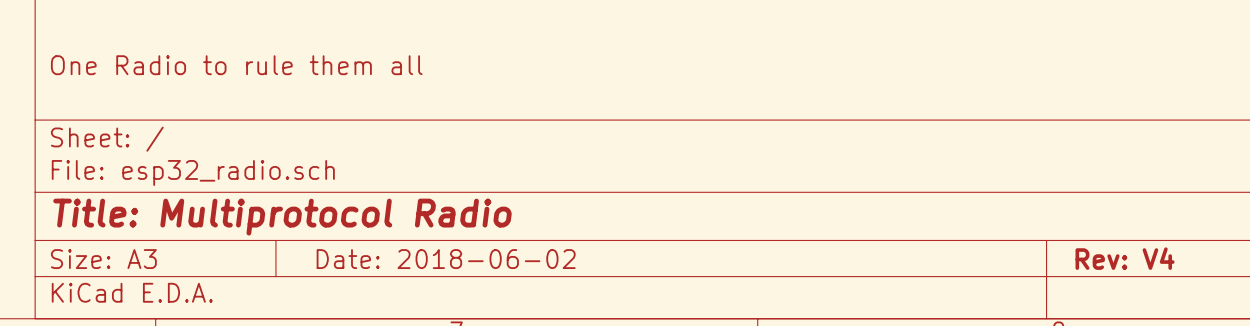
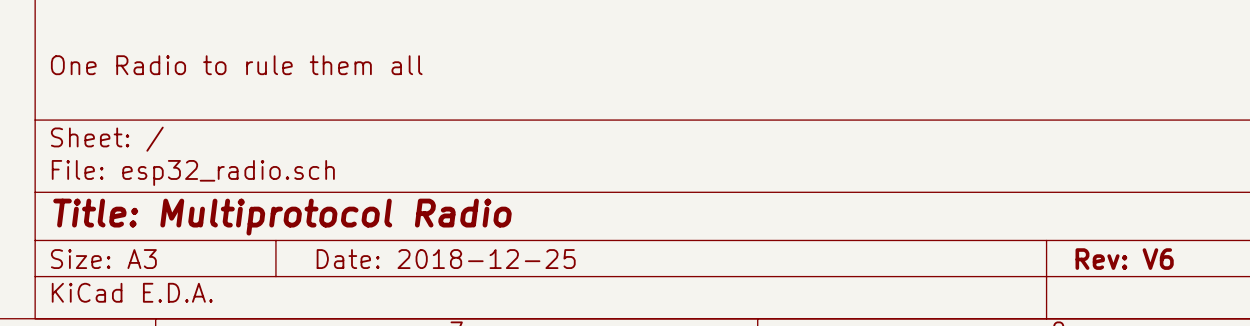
title block: Rev: V4 (1125, 258) -> Rev: V6 (1124, 259)
title block: Date: 2018-06-02 (446, 259) -> Date: 2018-12-25 (446, 259)

